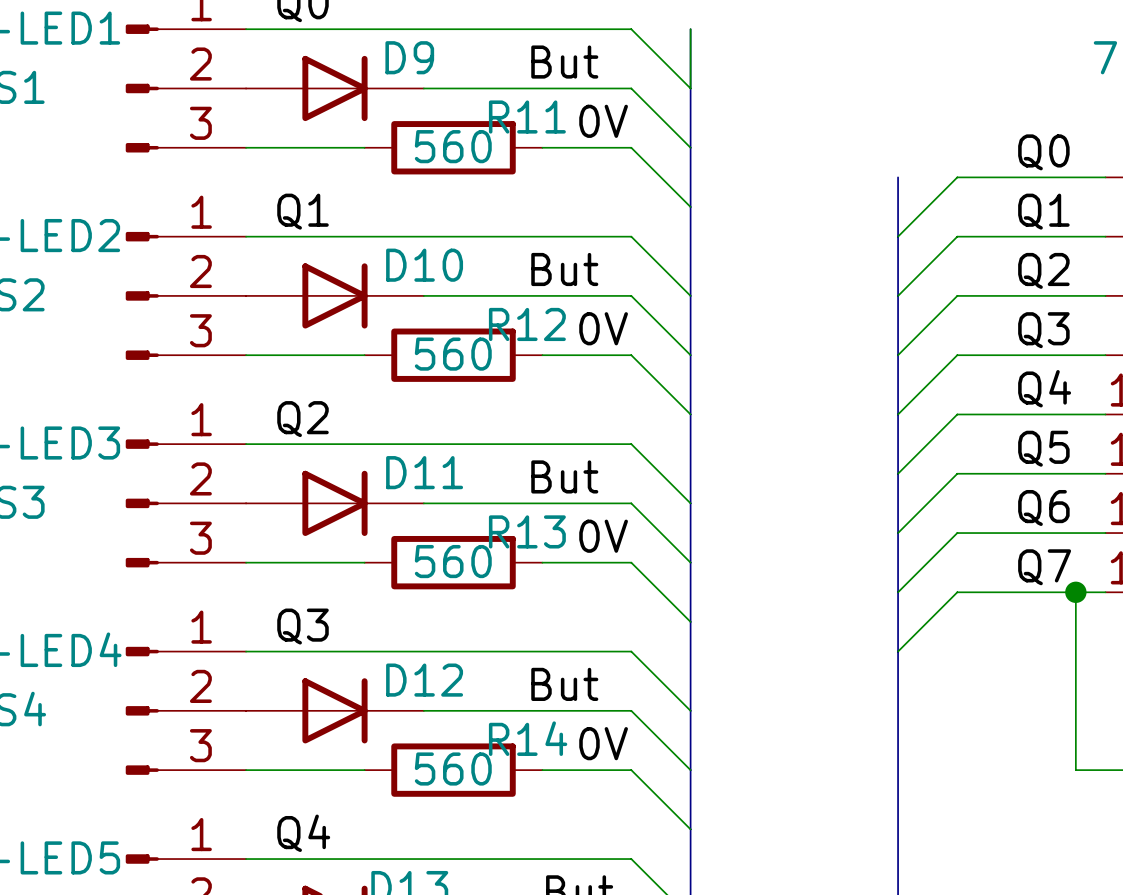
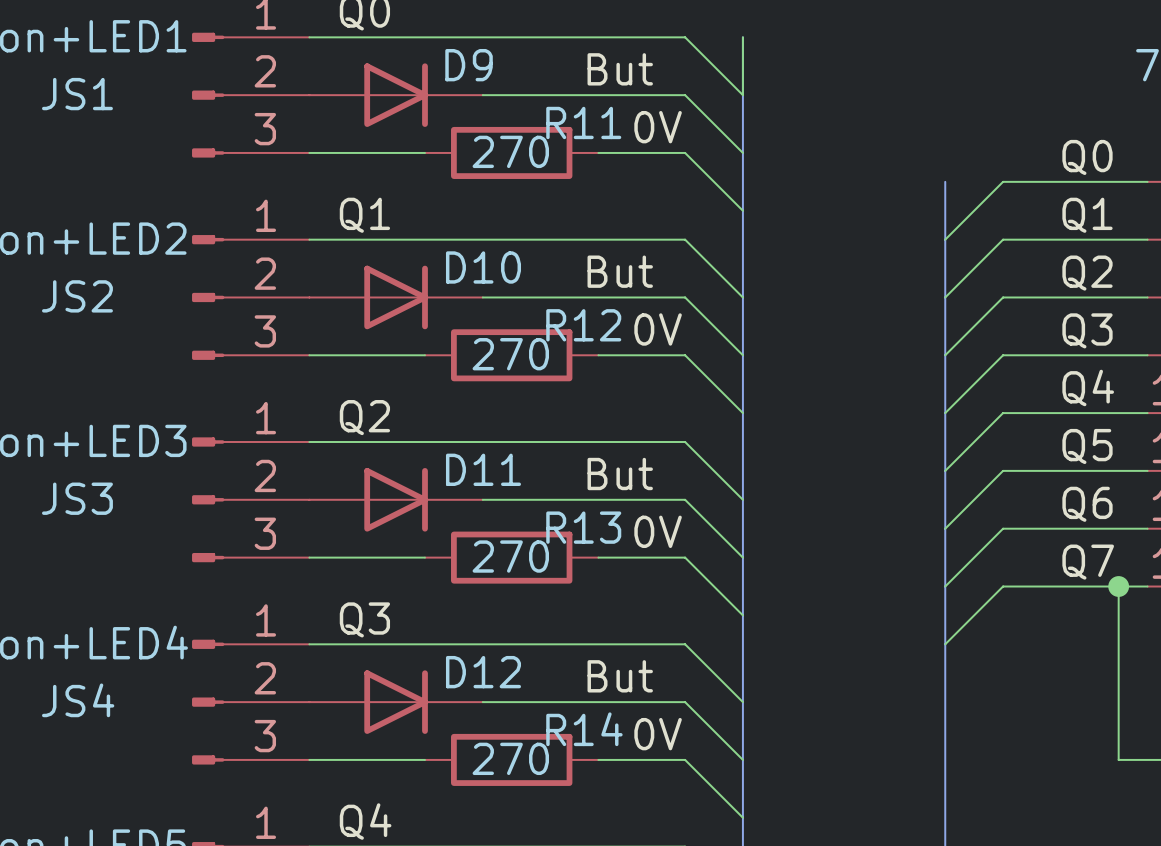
R11 value: 560 (453, 146) -> 270 (510, 151)
R12 value: 560 (453, 354) -> 270 (510, 354)
R13 value: 560 (453, 561) -> 270 (510, 556)
R14 value: 560 (453, 769) -> 270 (510, 758)

